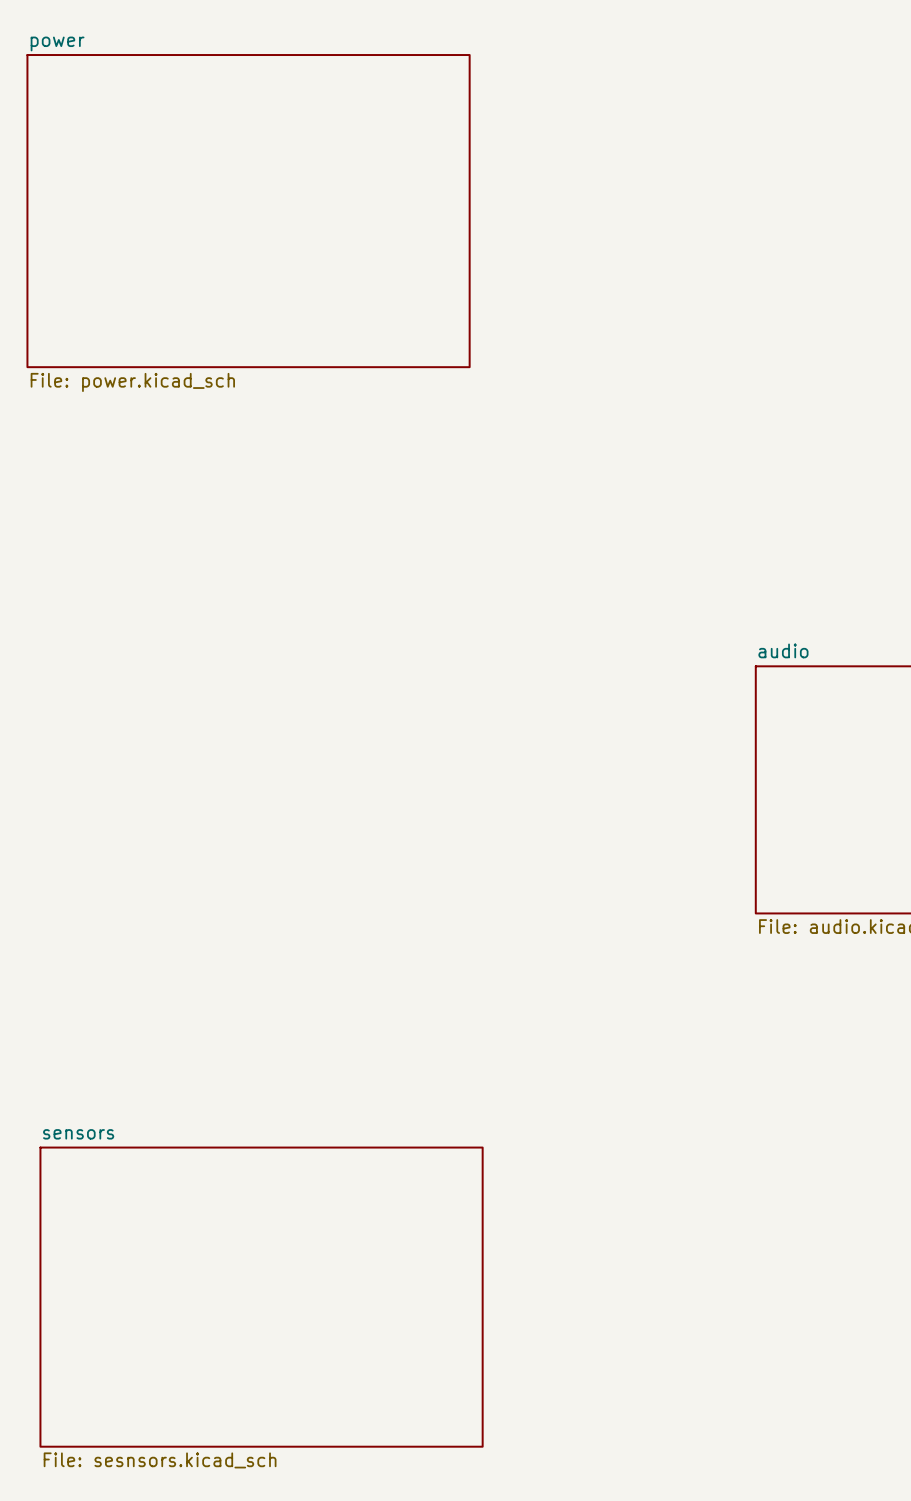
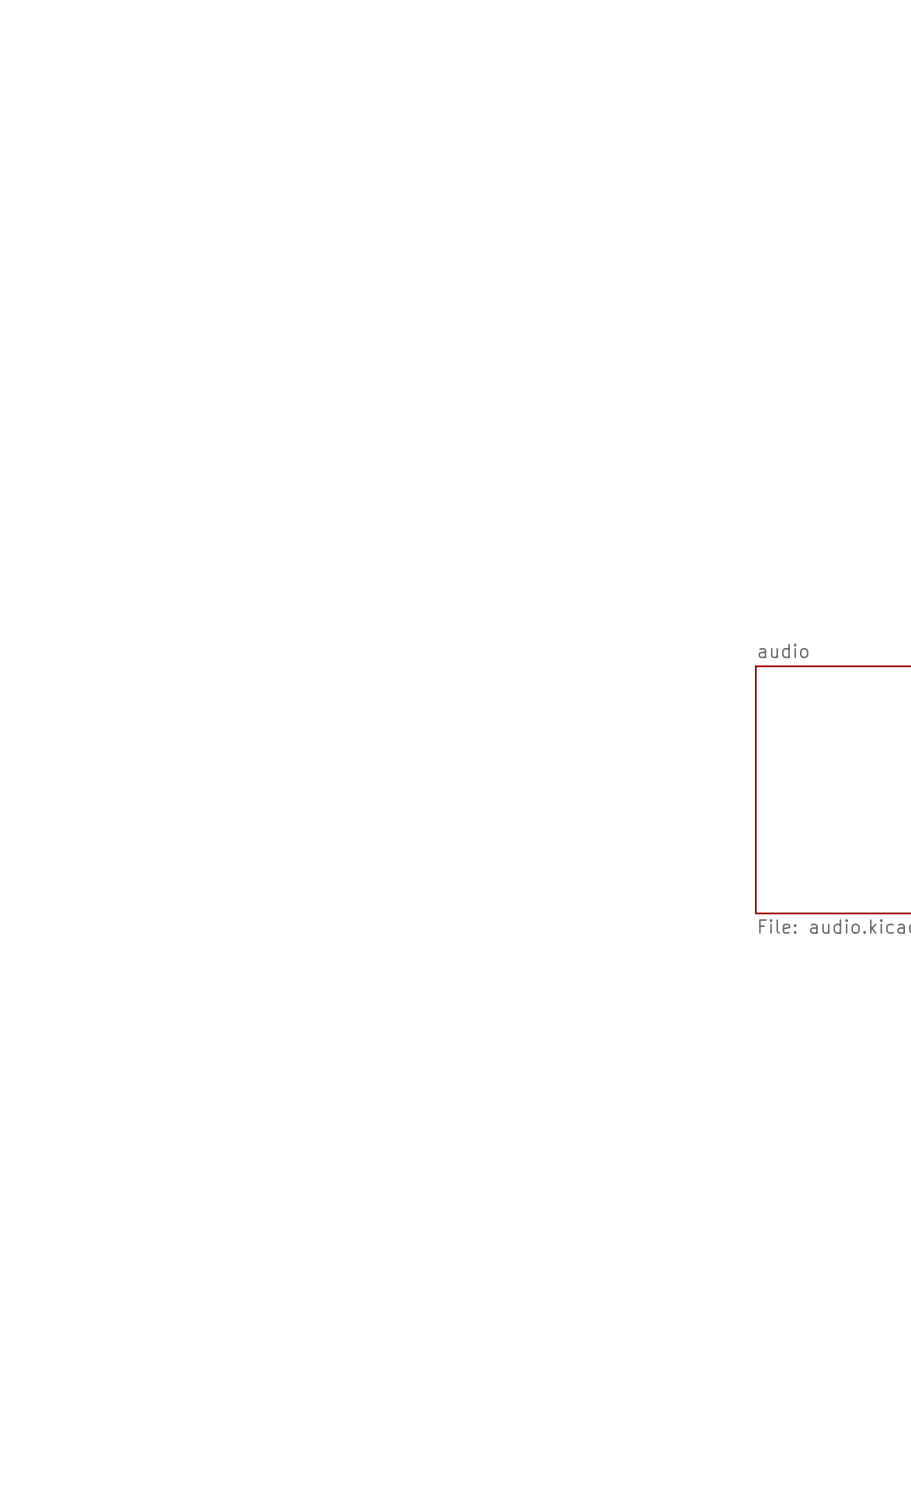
sheet power: File: power.kicad_sch (248, 211) -> none
sheet sensors: File: sesnsors.kicad_sch (261, 1297) -> none

